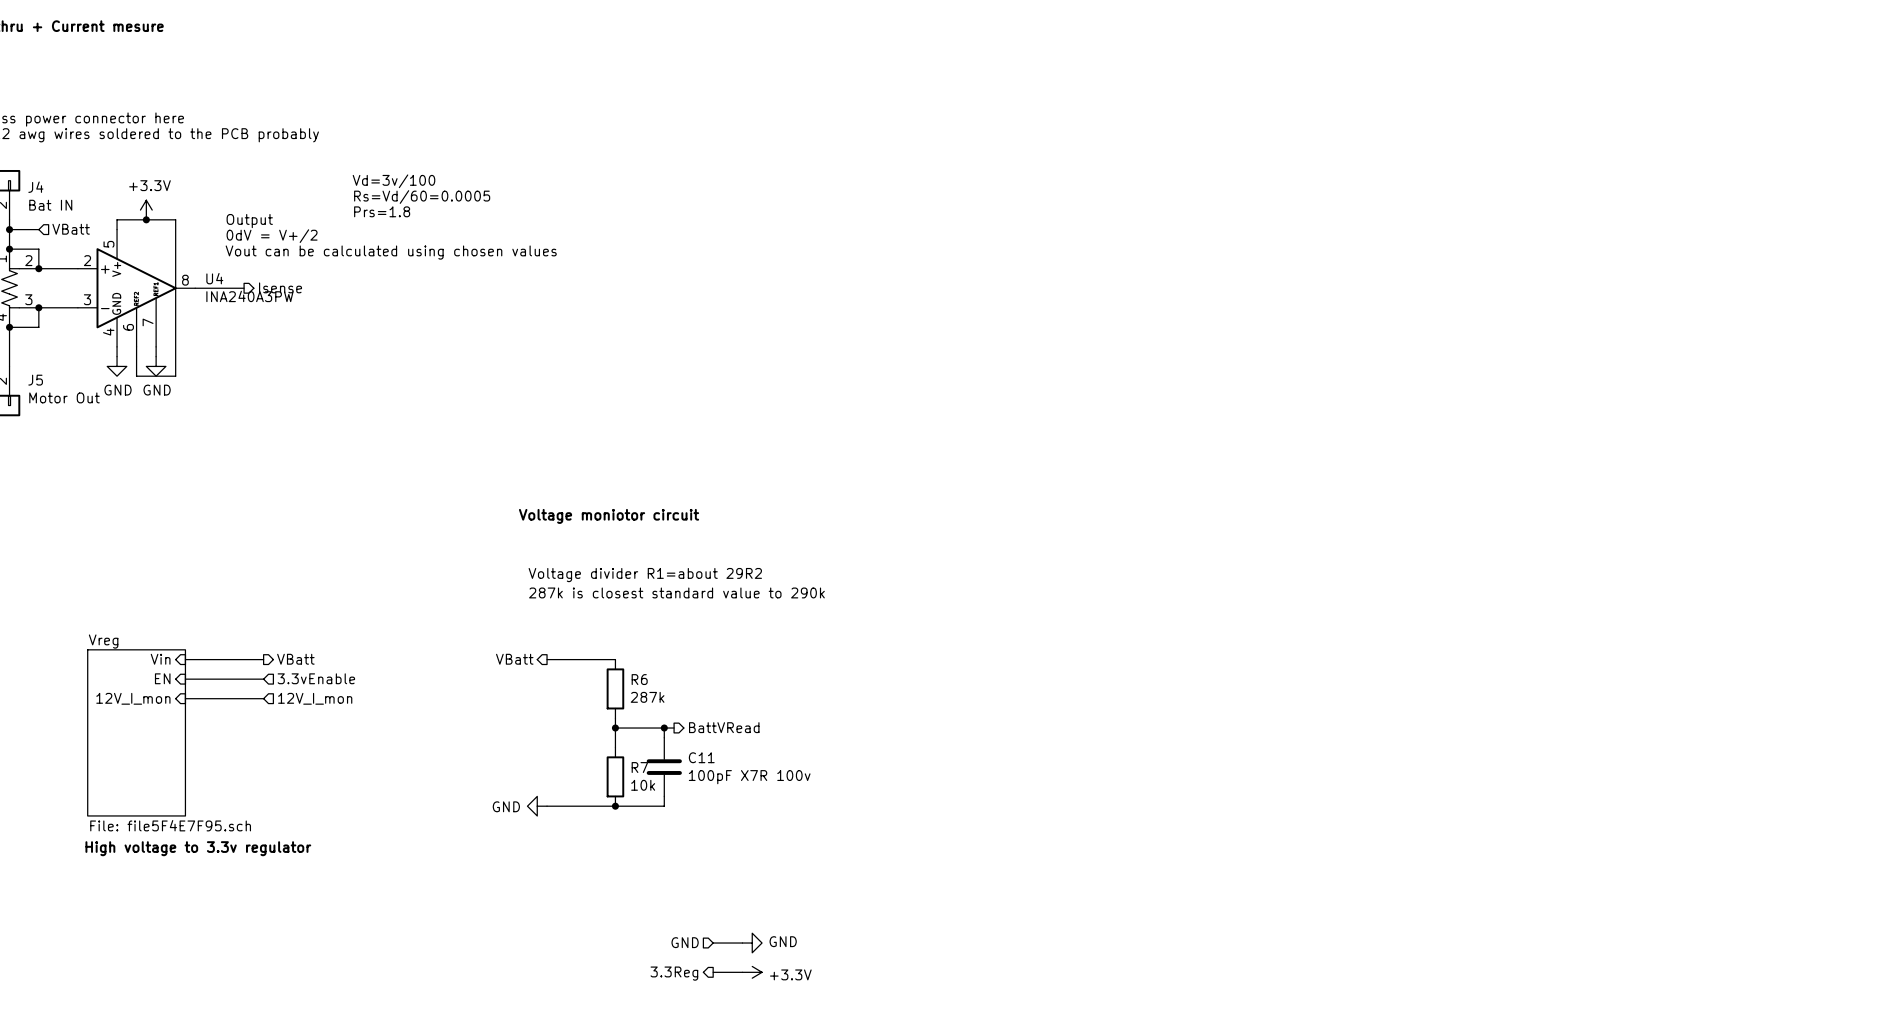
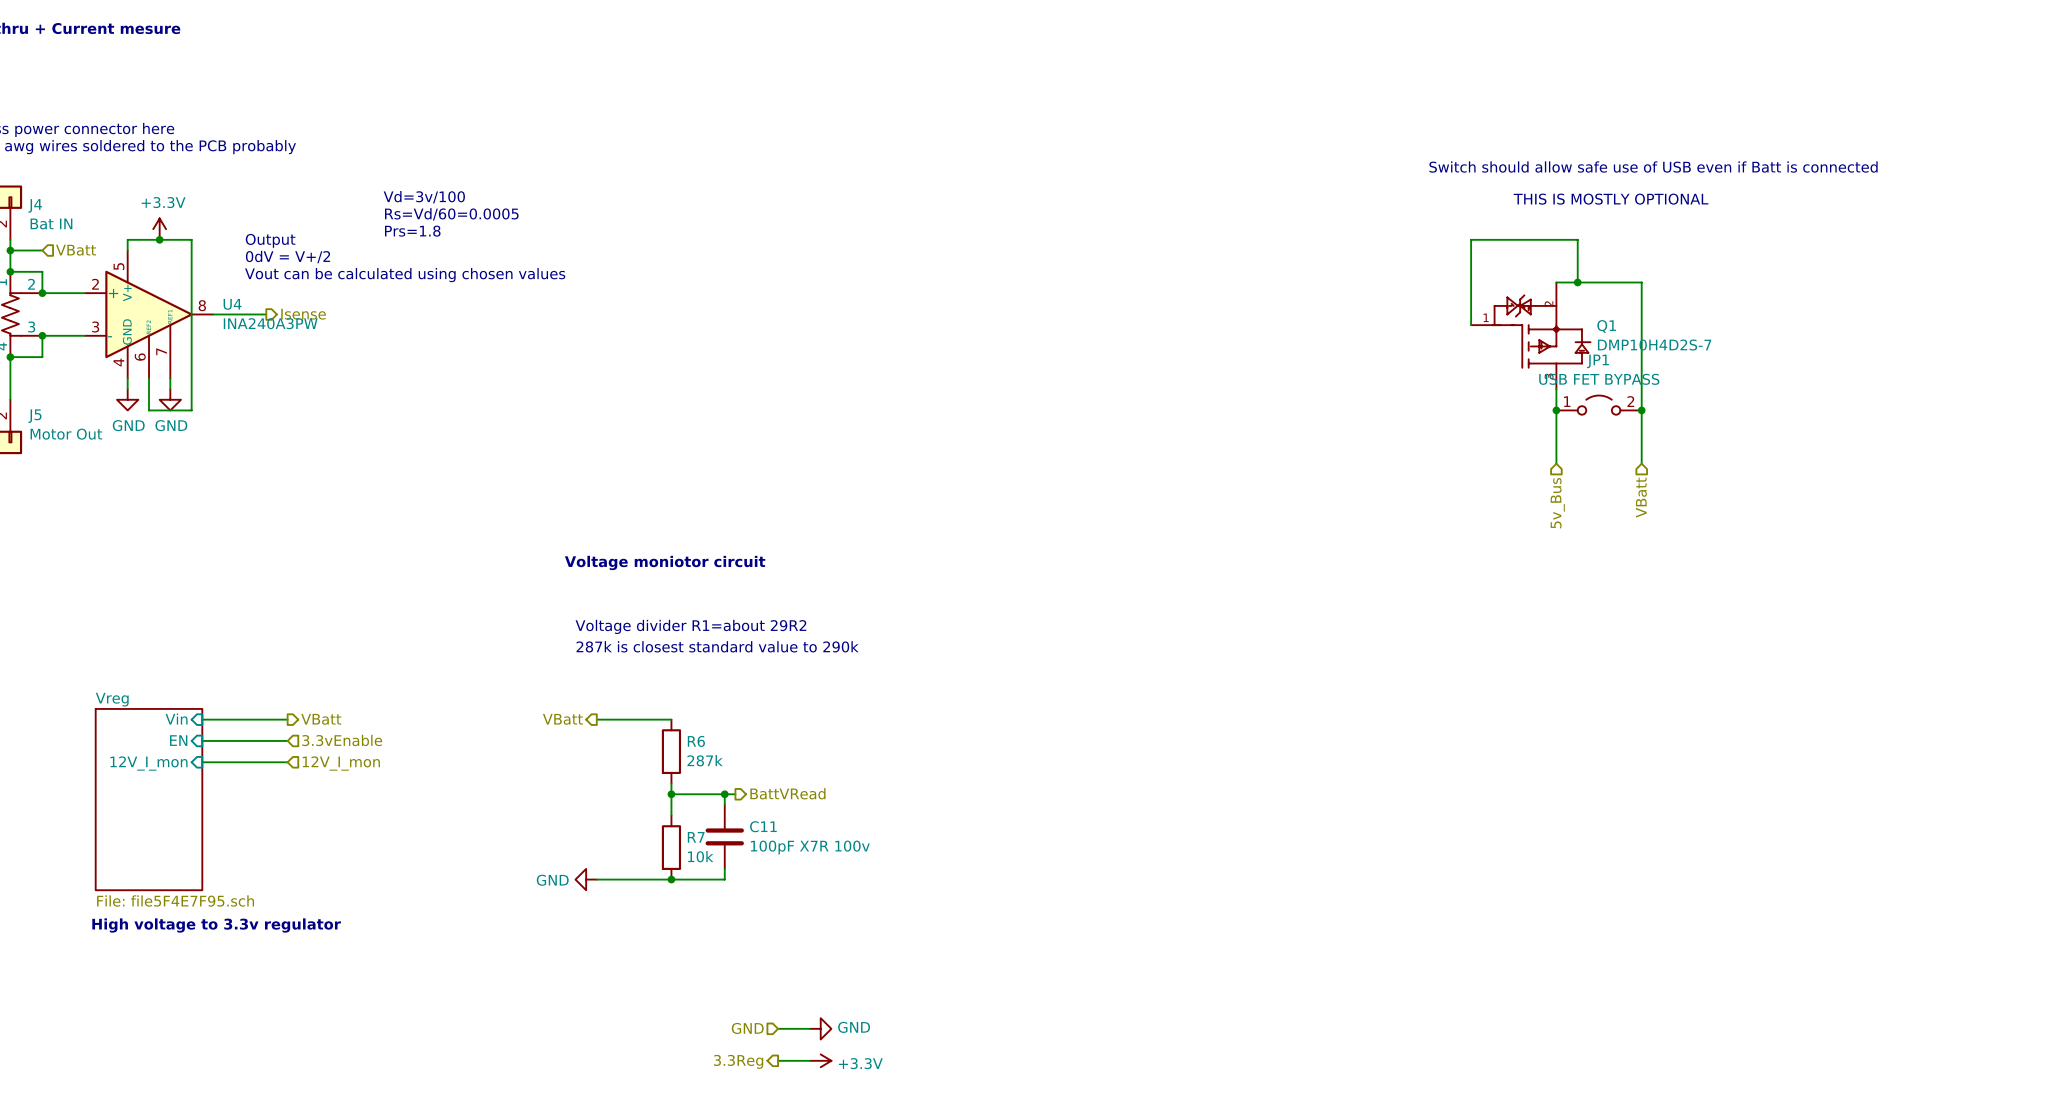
text: none -> Switch should allow safe use of USB even if Batt is connected (1653, 167)
text: none -> THIS IS MOSTLY OPTIONAL (1611, 199)
wire: none -> (1556, 282) (1641, 282) (1641, 463)
wire: none -> (1577, 282) (1577, 239) (1471, 239) (1471, 325)
junction: none -> (1577, 282)
Q1: none -> DMP10H4D2S-7 (1530, 335)
wire: none -> (1556, 389) (1556, 463)
JP1: none -> USB FET BYPASS (1599, 405)
junction: none -> (1556, 410)
junction: none -> (1641, 410)
hierarchical label: none -> VBatt (1641, 497)
hierarchical label: none -> 5v_Bus (1557, 503)

